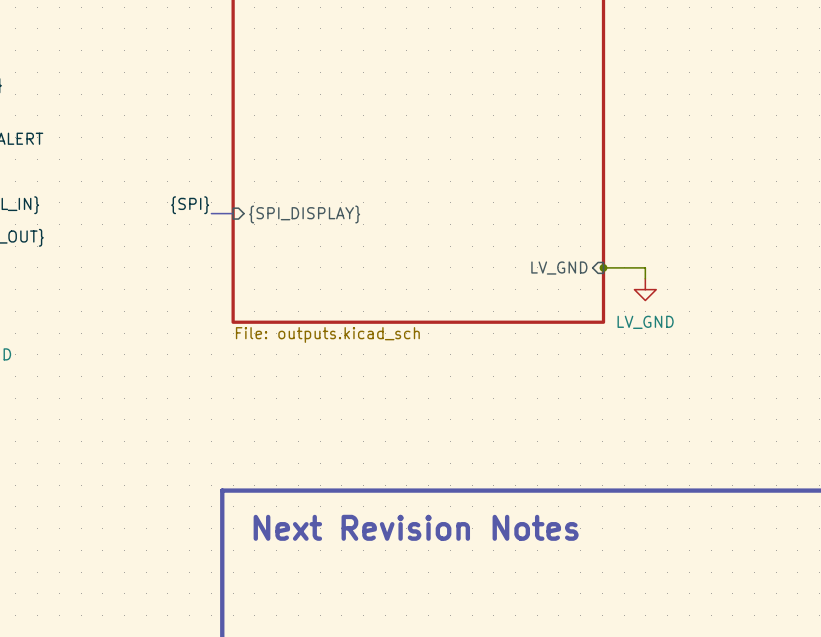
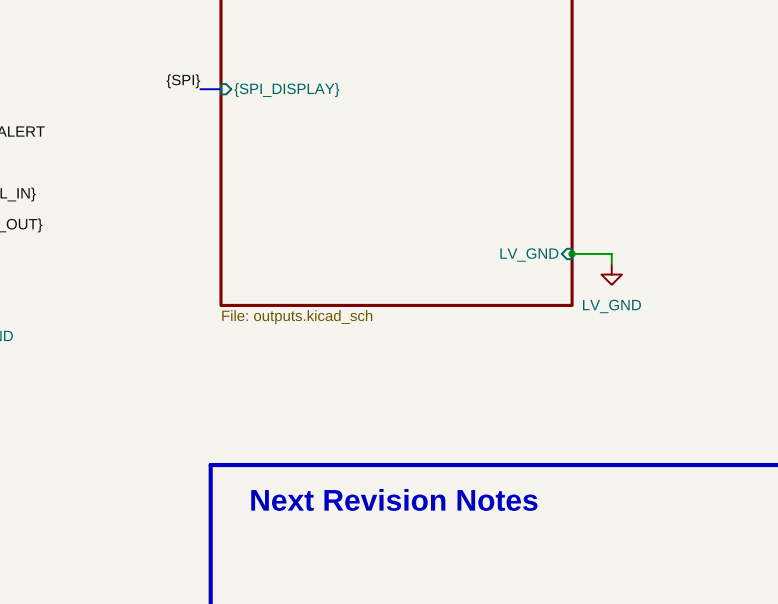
label position: {SPI} (190, 205) -> {SPI} (183, 81)
bus: (211, 213) (233, 213) -> (200, 89) (220, 89)
sheet pin position: {SPI_DISPLAY} (304, 214) -> {SPI_DISPLAY} (286, 90)

